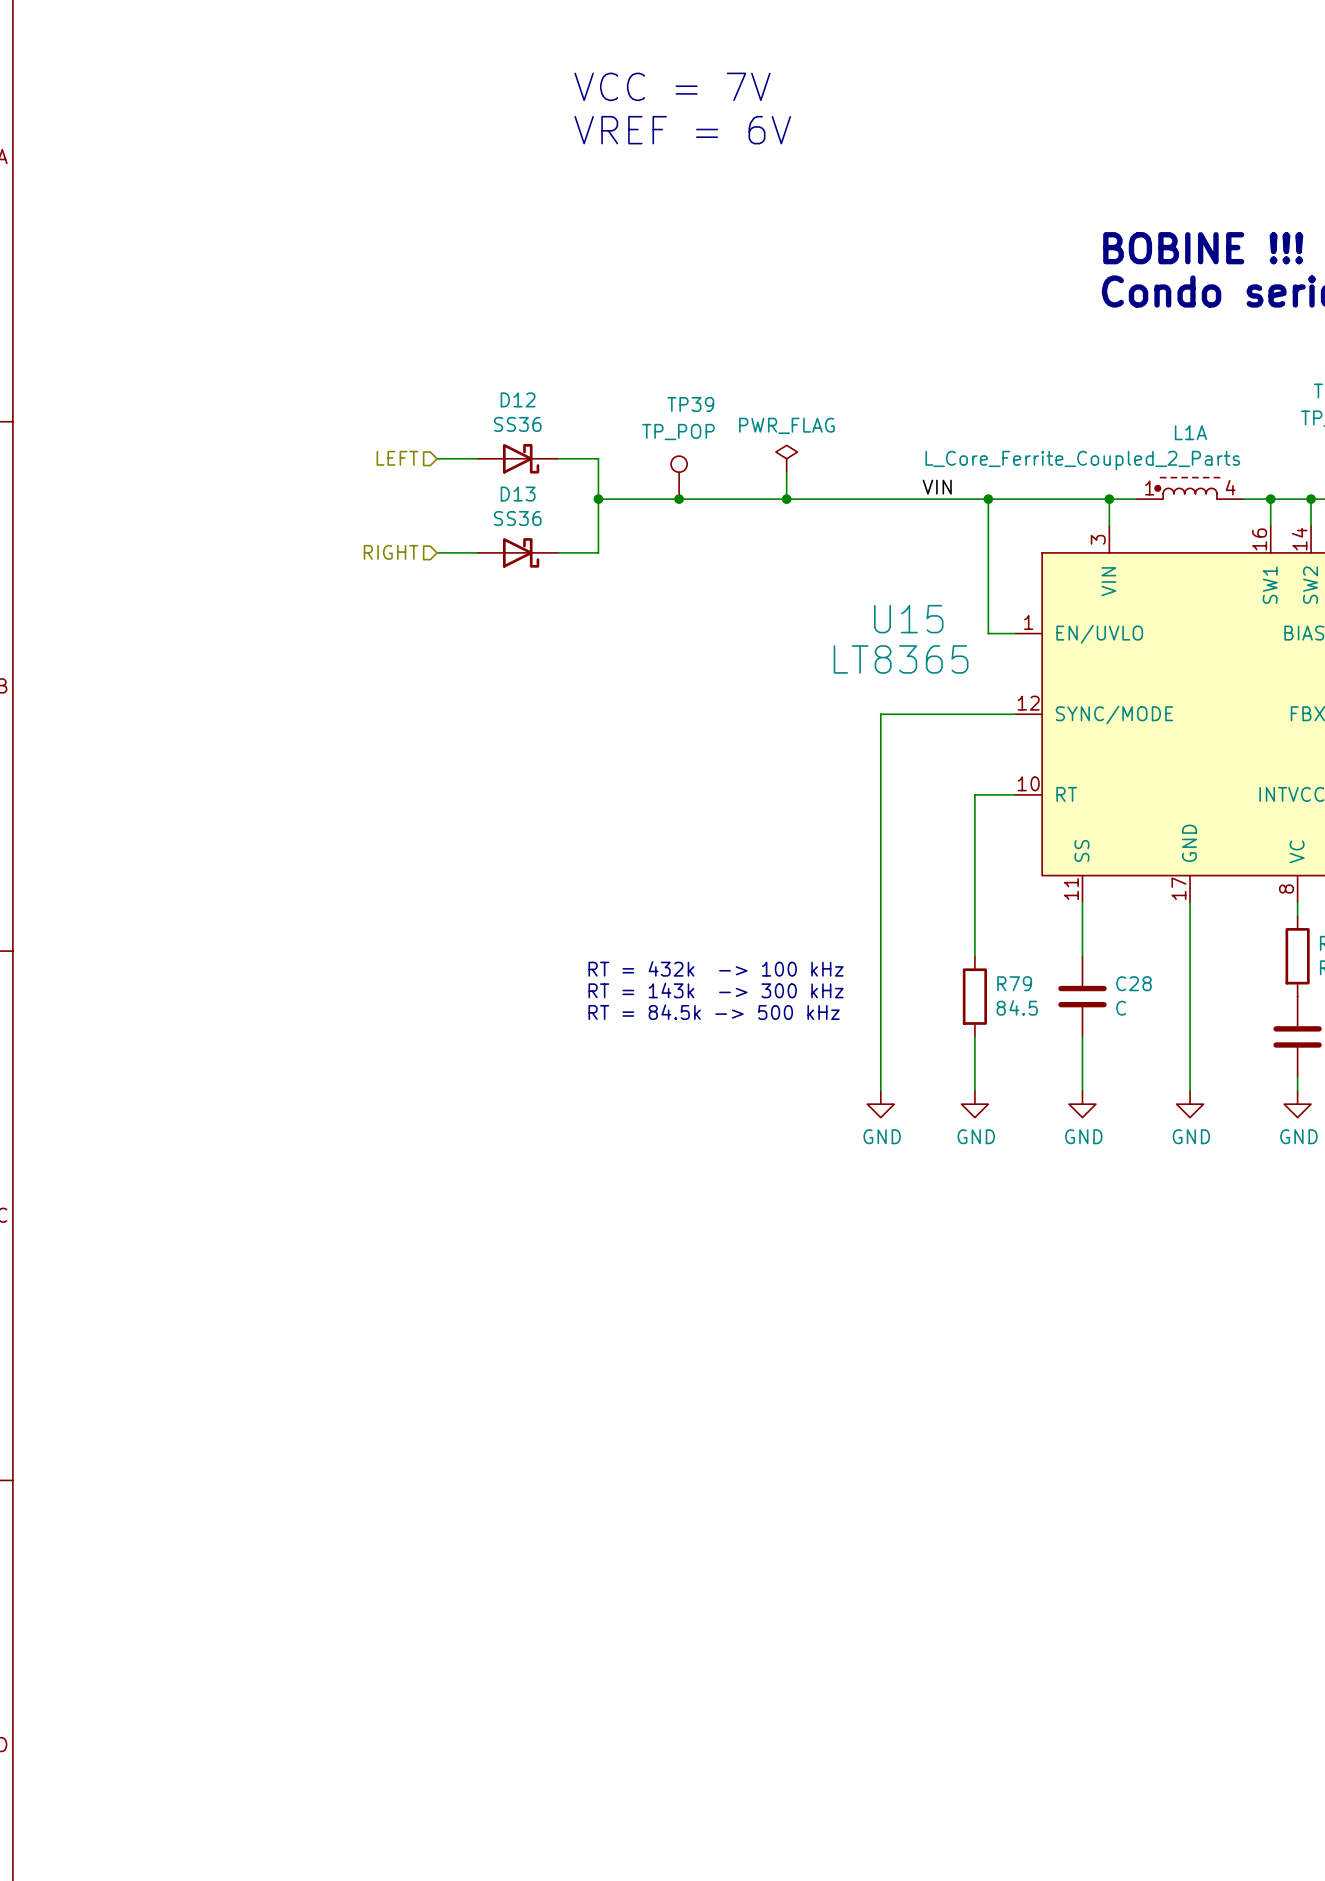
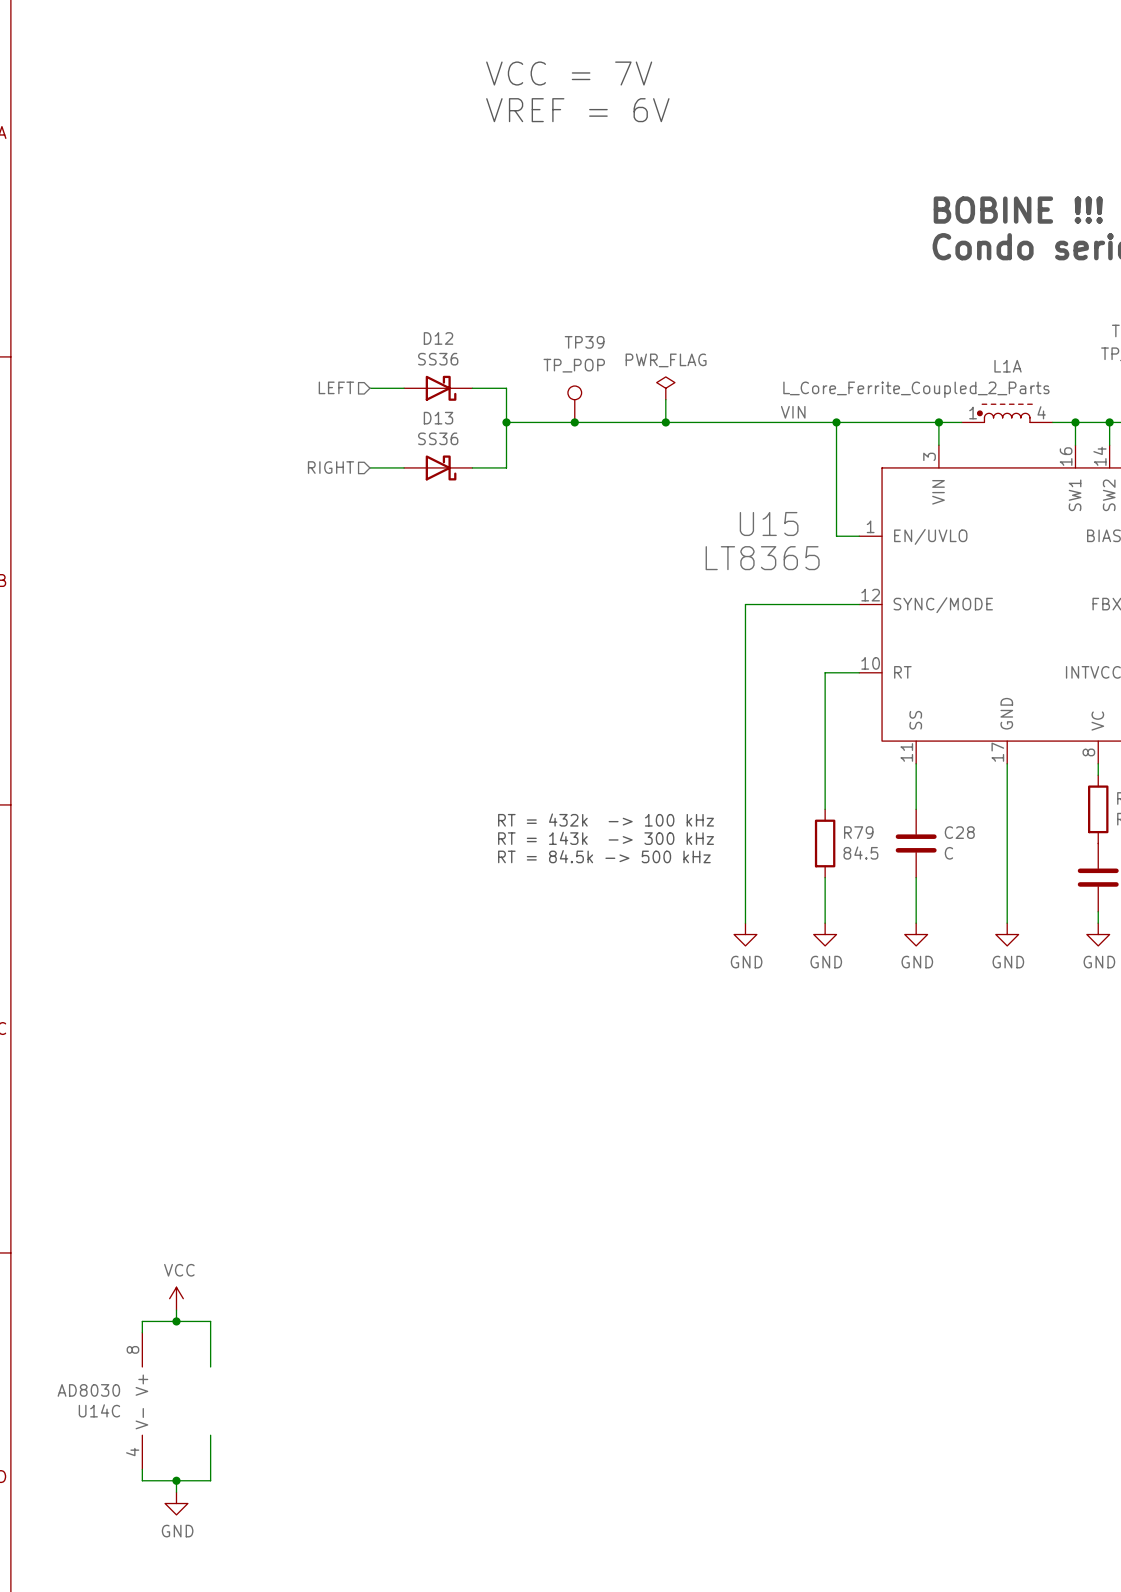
power symbol: none -> VCC (176, 1298)
wire: none -> (176, 1310) (176, 1321)
junction: none -> (176, 1321)
wire: none -> (142, 1332) (142, 1321) (210, 1321) (210, 1366)
U14C: none -> AD8030 (142, 1401)
wire: none -> (210, 1435) (210, 1480) (142, 1480) (142, 1469)
wire: none -> (176, 1480) (176, 1492)
junction: none -> (176, 1480)
power symbol: none -> GND (176, 1503)

